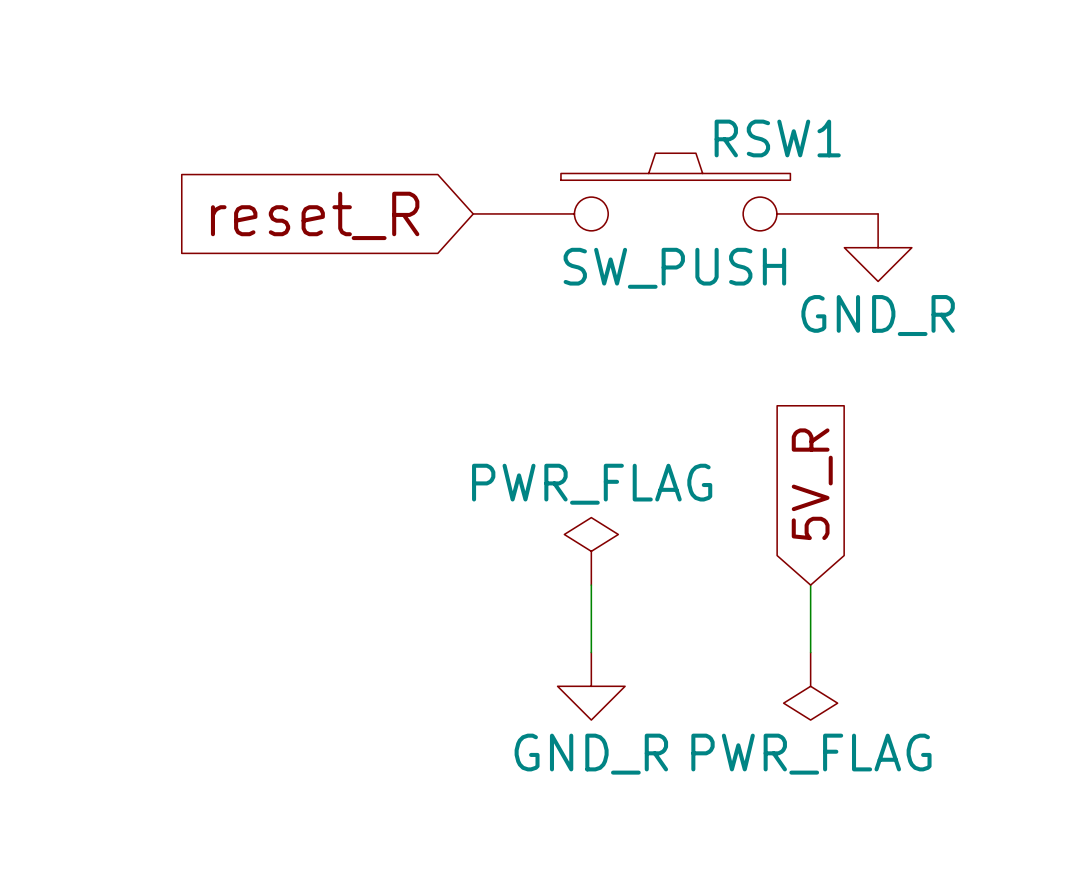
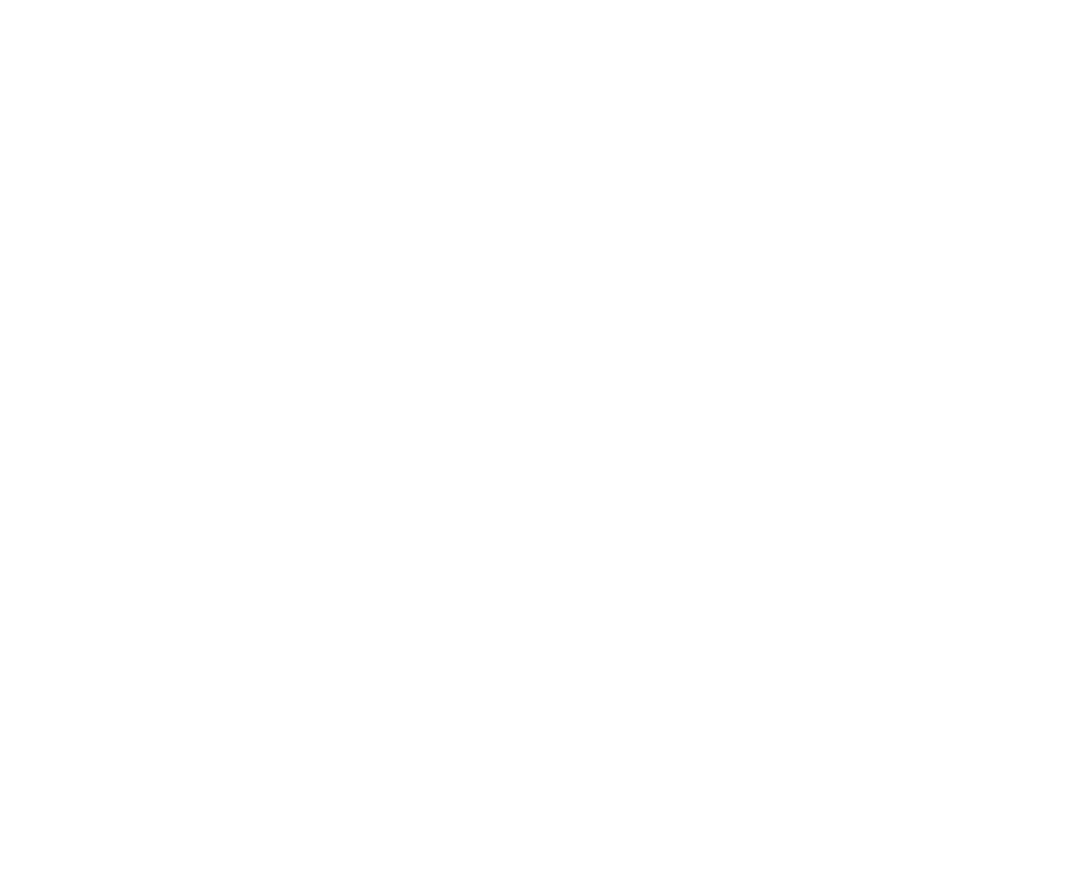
RSW1: SW_PUSH (675, 192) -> none
global label: reset_R (315, 215) -> none
power symbol: GND_R (878, 247) -> none
global label: 5V_R (812, 484) -> none
power symbol: PWR_FLAG (591, 551) -> none
wire: (591, 585) (591, 652) -> none
wire: (810, 585) (810, 652) -> none
power symbol: GND_R (591, 686) -> none
power symbol: PWR_FLAG (810, 686) -> none

